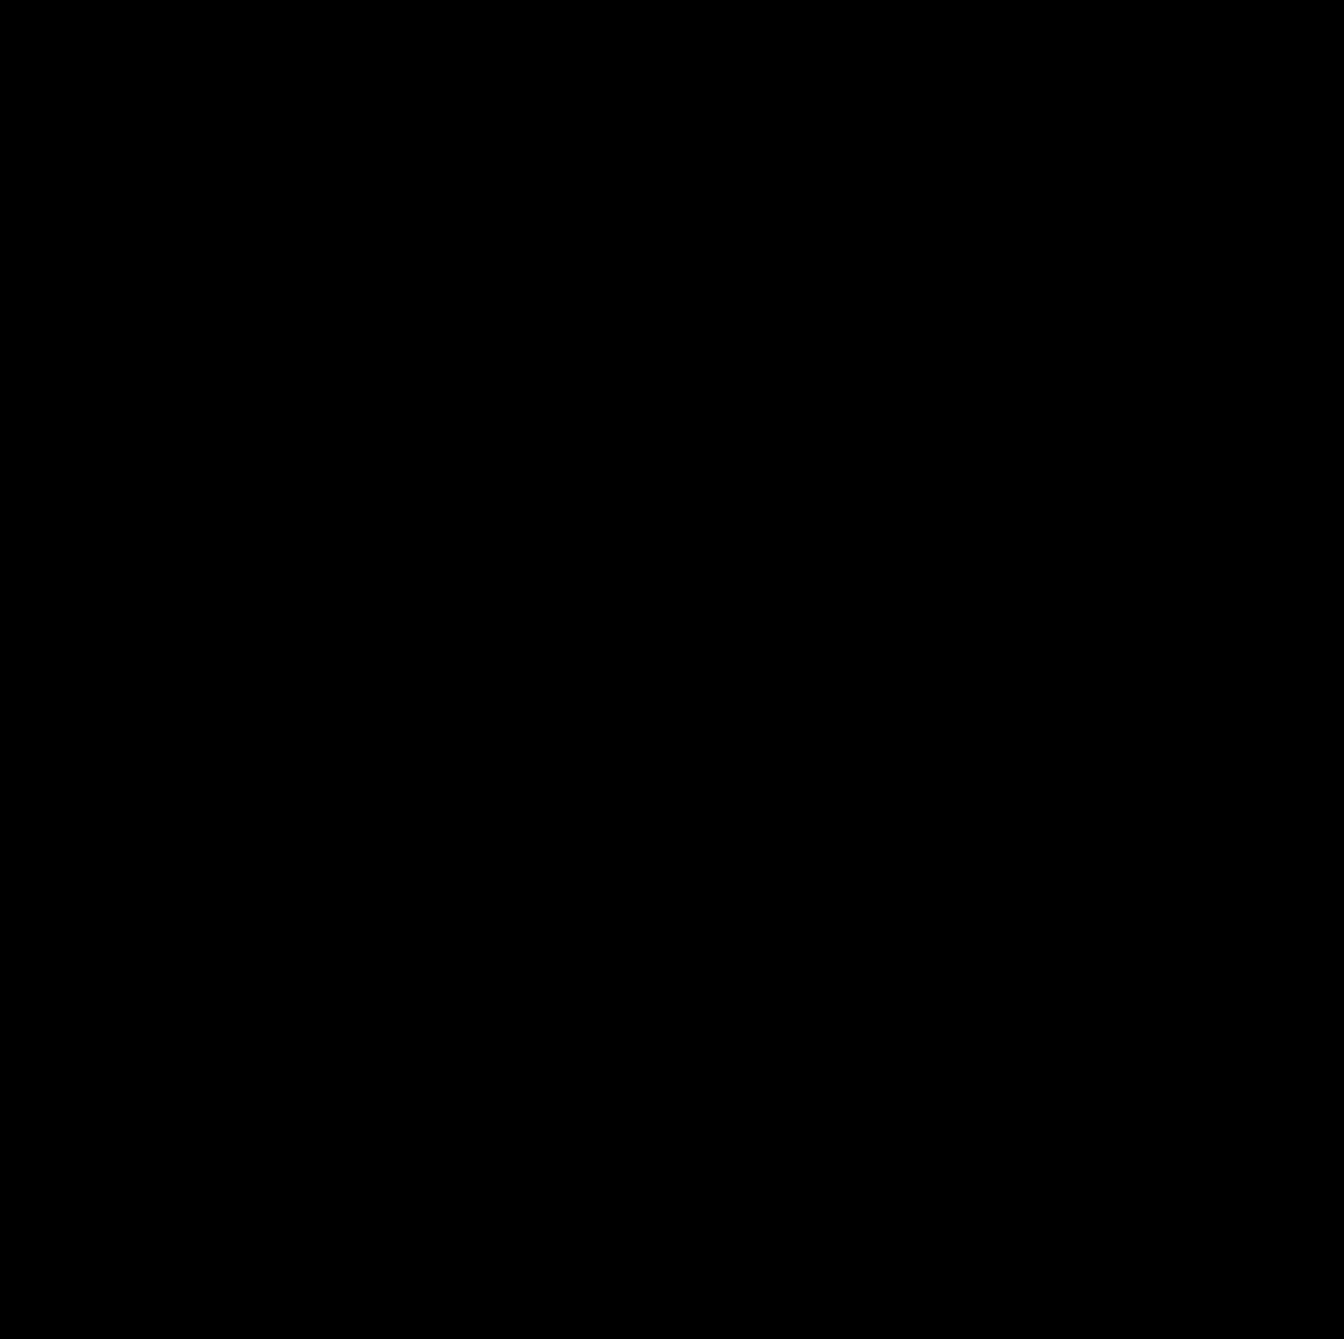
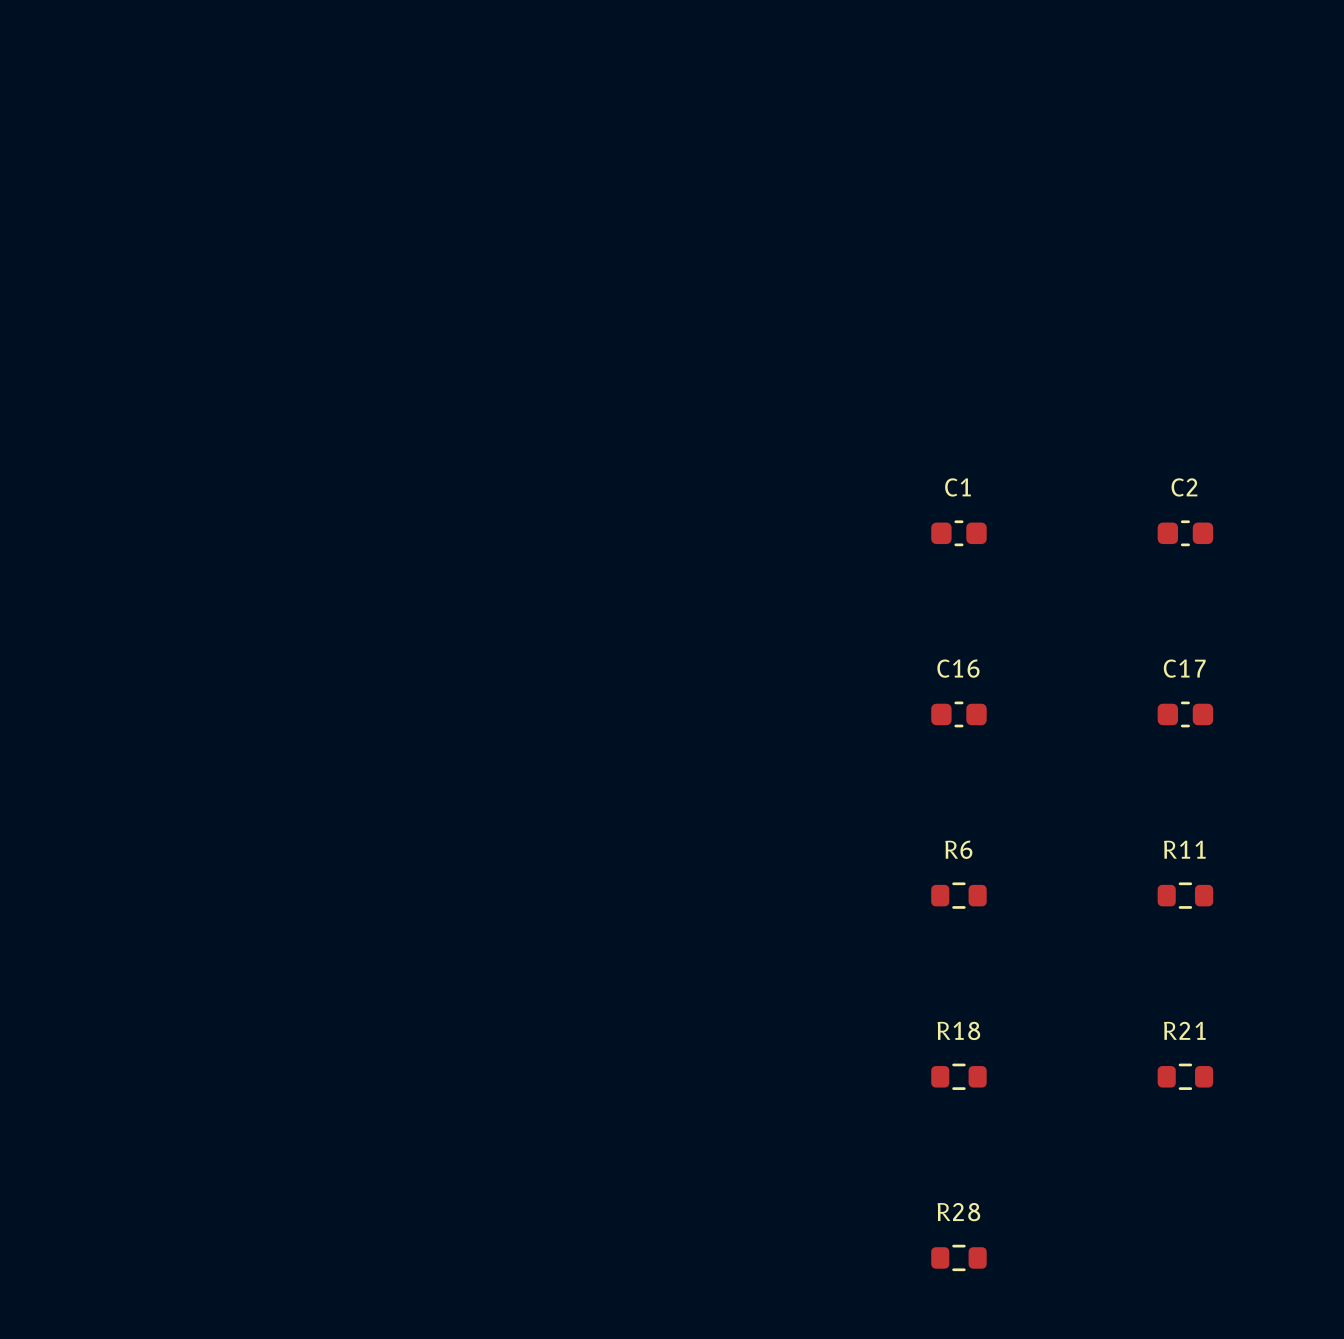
C1: none -> (958, 533)
C2: none -> (1185, 533)
C16: none -> (958, 714)
C17: none -> (1185, 714)
R6: none -> (958, 895)
R11: none -> (1185, 895)
R18: none -> (958, 1076)
R21: none -> (1185, 1076)
R28: none -> (958, 1257)

